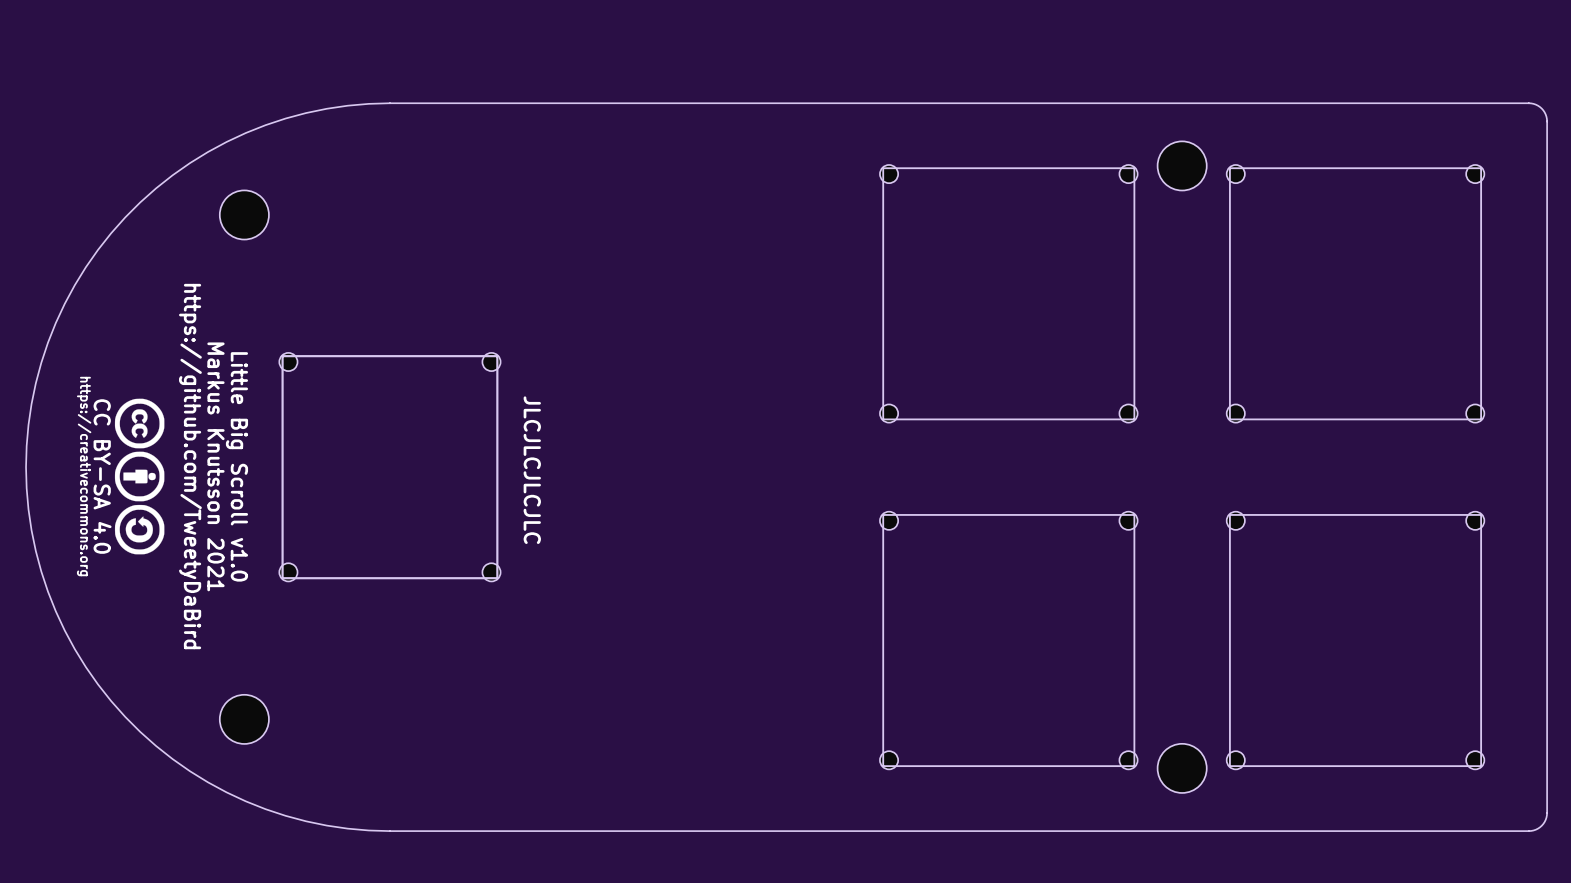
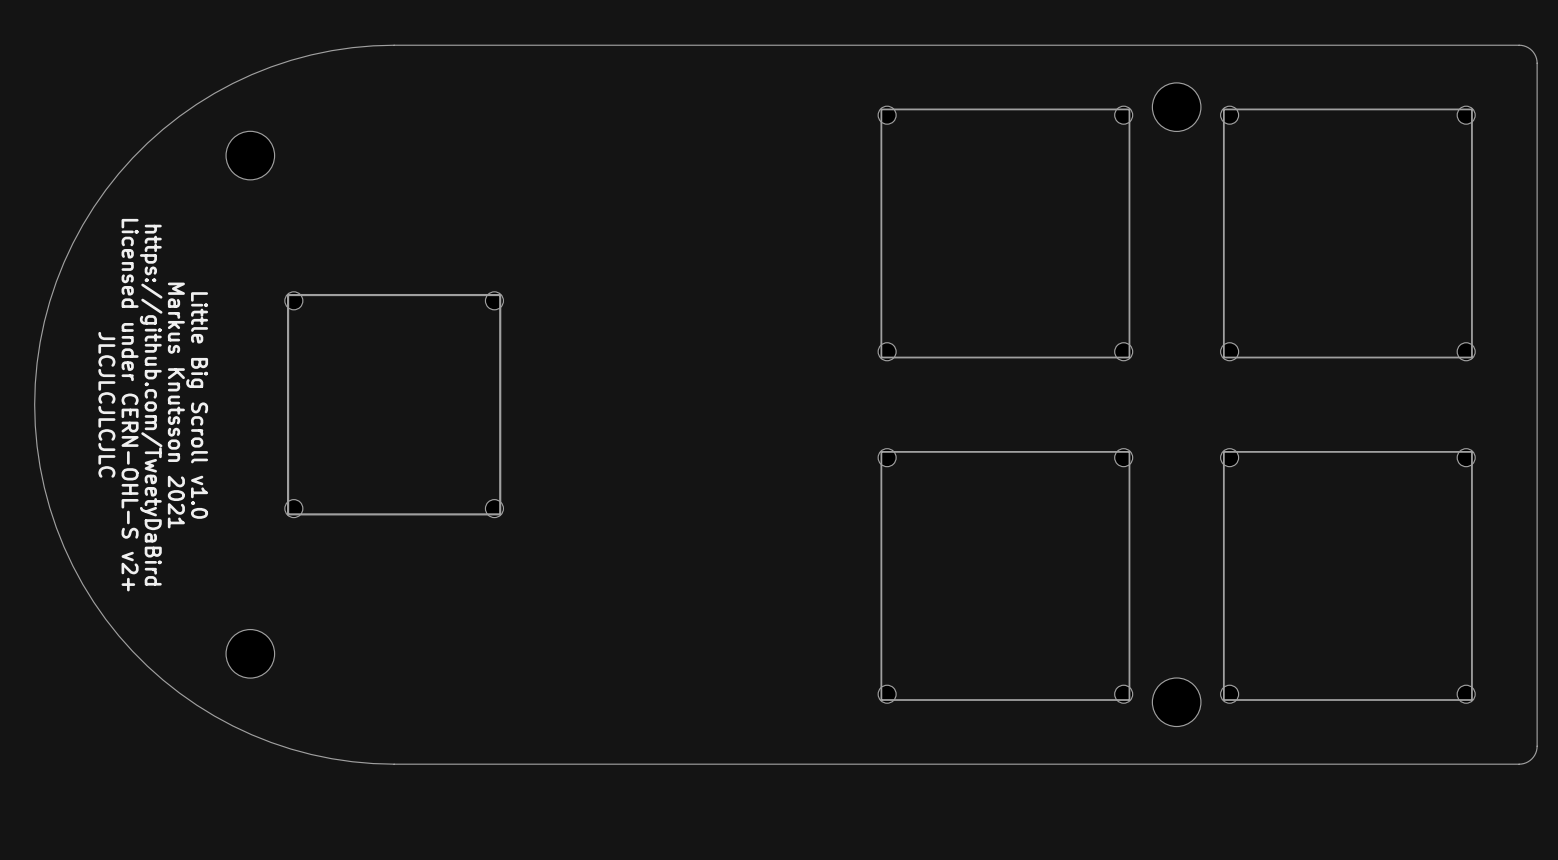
drawing: [114, 398, 165, 555] -> none
text: https://github.com/TweetyDaBird (190, 466) -> Little Big Scroll v1.0 (197, 405)
text position: Markus Knutsson 2021 (215, 466) -> Markus Knutsson 2021 (176, 405)
text: Little Big Scroll v1.0 (236, 466) -> none
text: none -> Licensed under CERN-OHL-S v2+ (130, 405)
text: none -> https://github.com/TweetyDaBird (151, 405)
text position: JLCJLCJLCJLC (532, 470) -> JLCJLCJLCJLC (106, 404)

